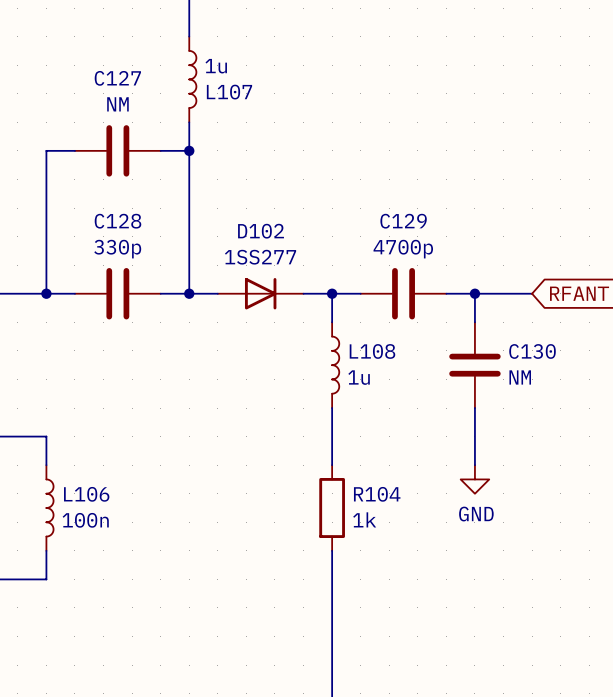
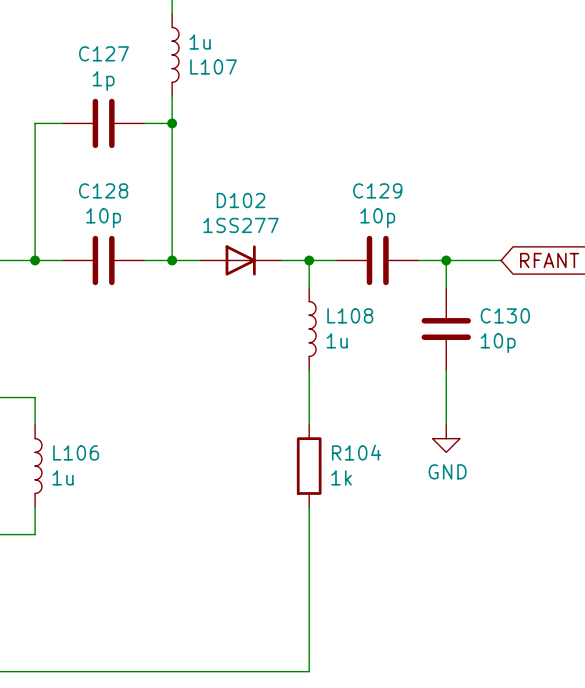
C127 value: NM (117, 104) -> 1p (103, 81)
C128 value: 330p (117, 249) -> 10p (103, 218)
C129 value: 4700p (403, 249) -> 10p (377, 218)
C130 value: NM (520, 377) -> 10p (498, 343)
L106 value: 100n (85, 520) -> 1u (63, 477)

